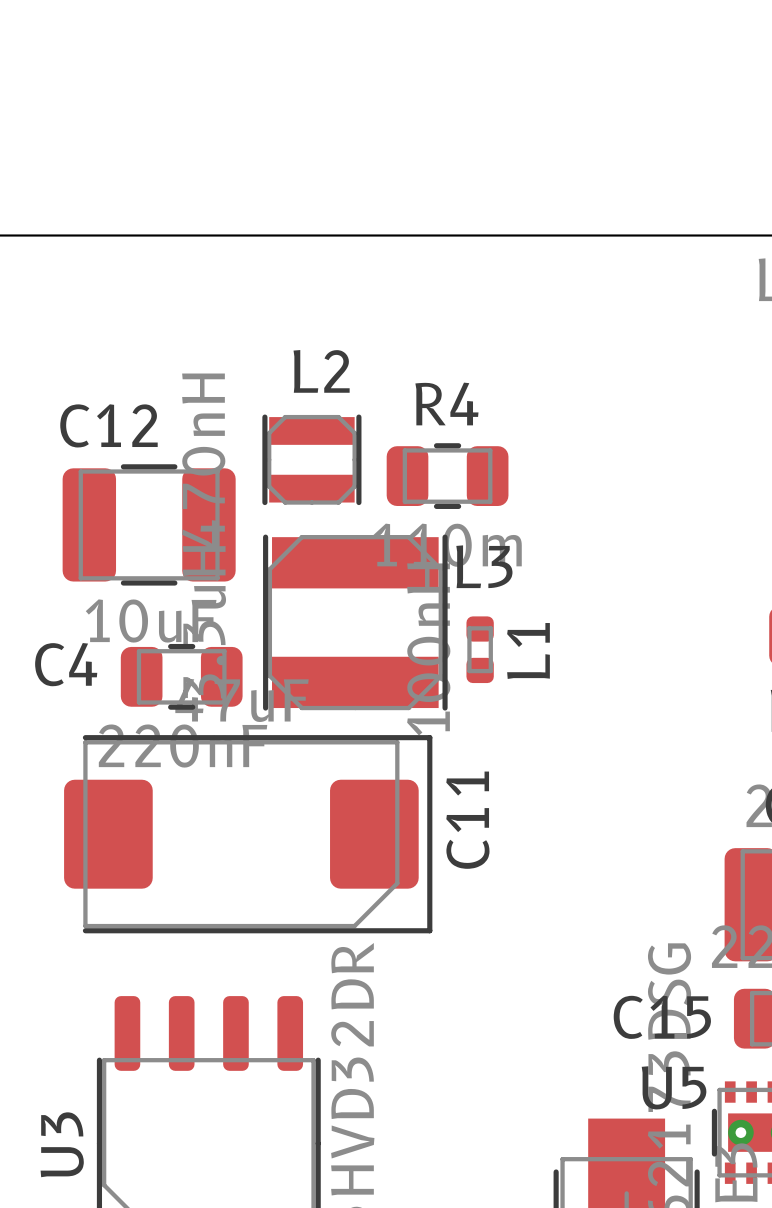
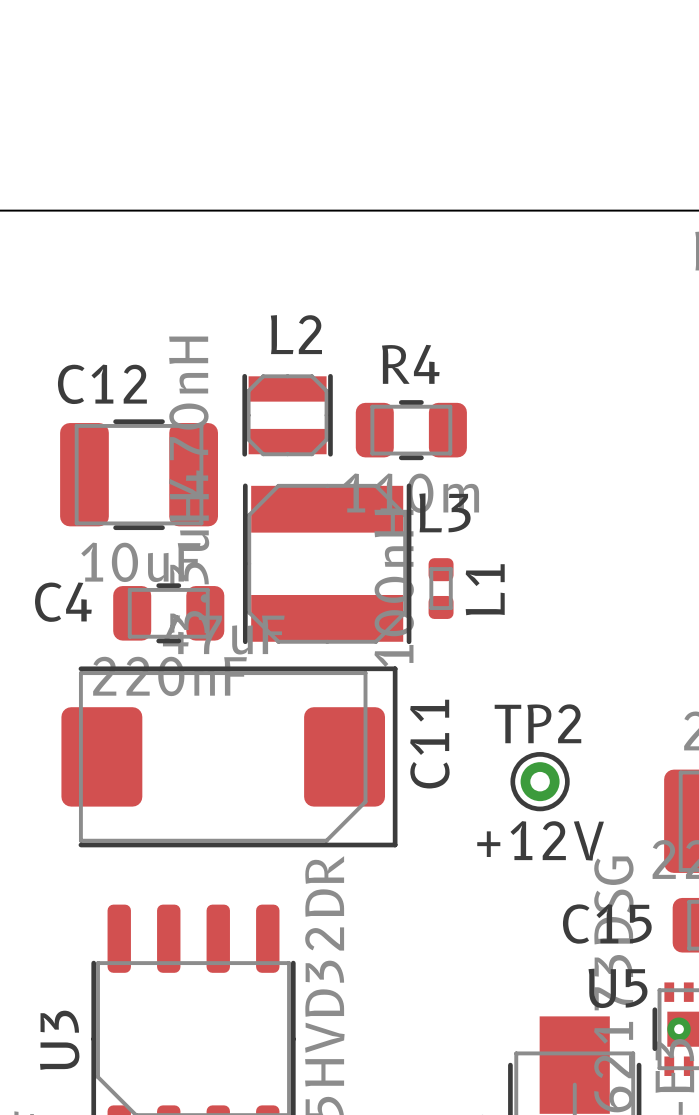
TP2: none -> +12V (540, 781)

